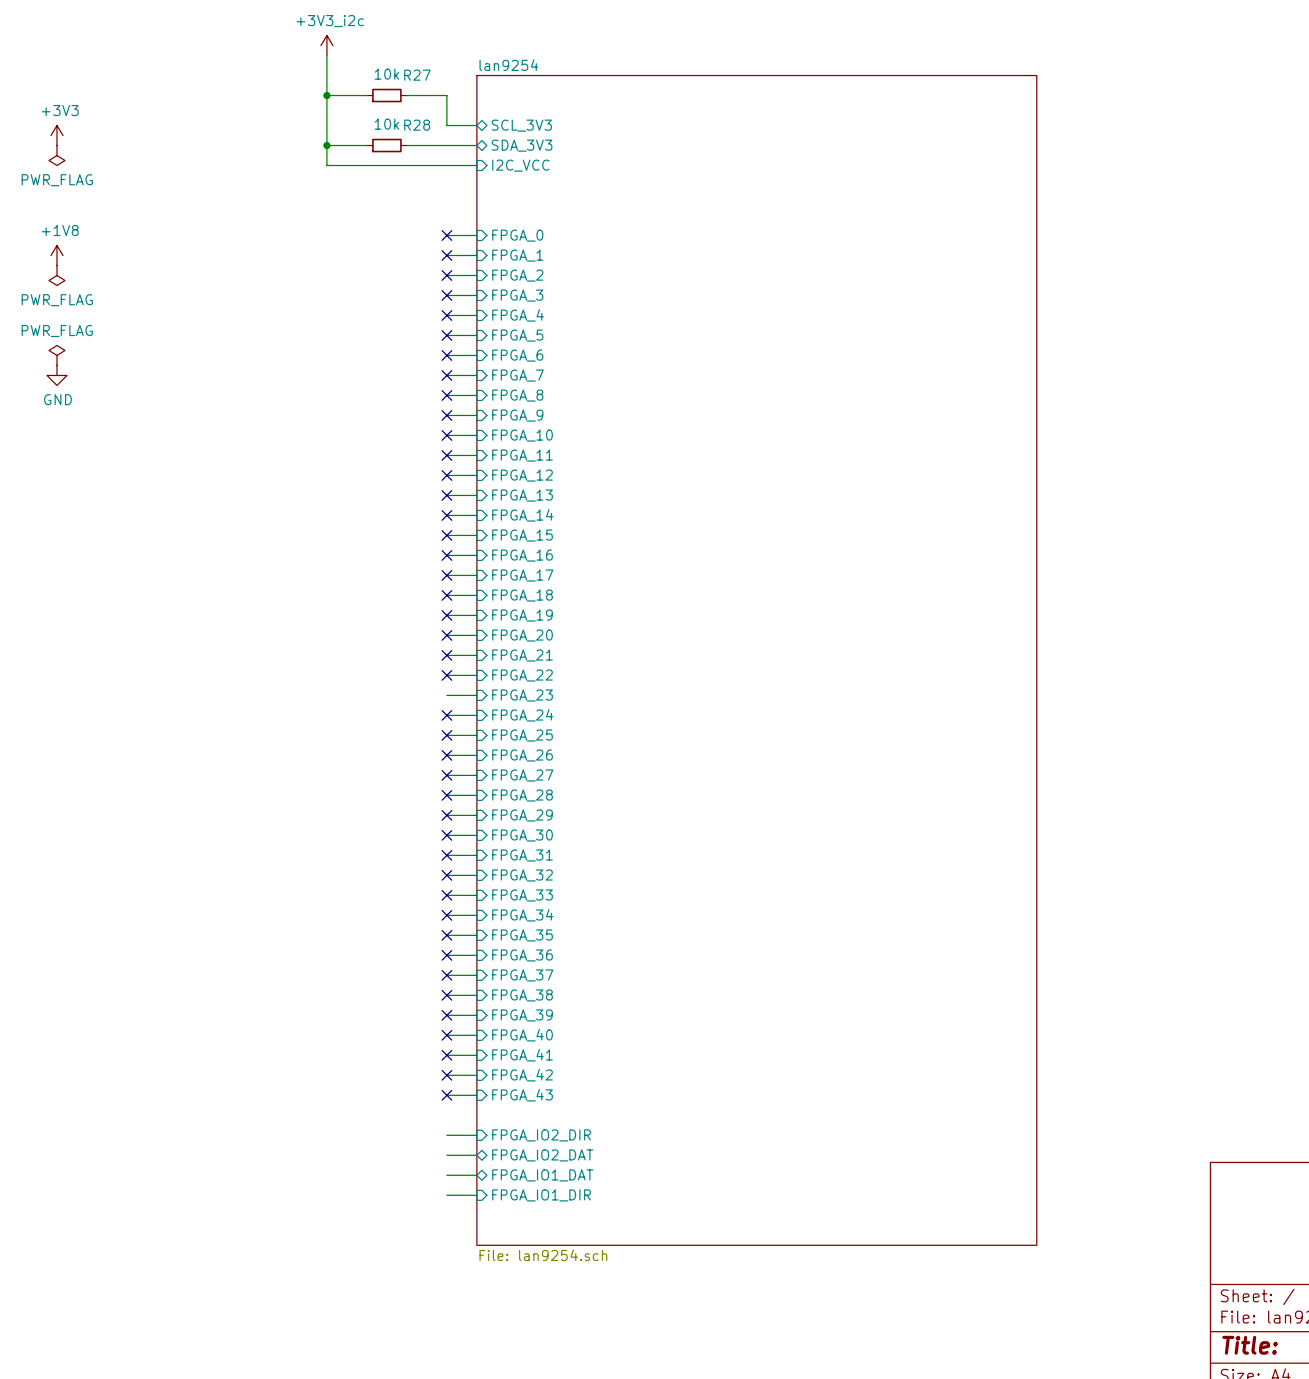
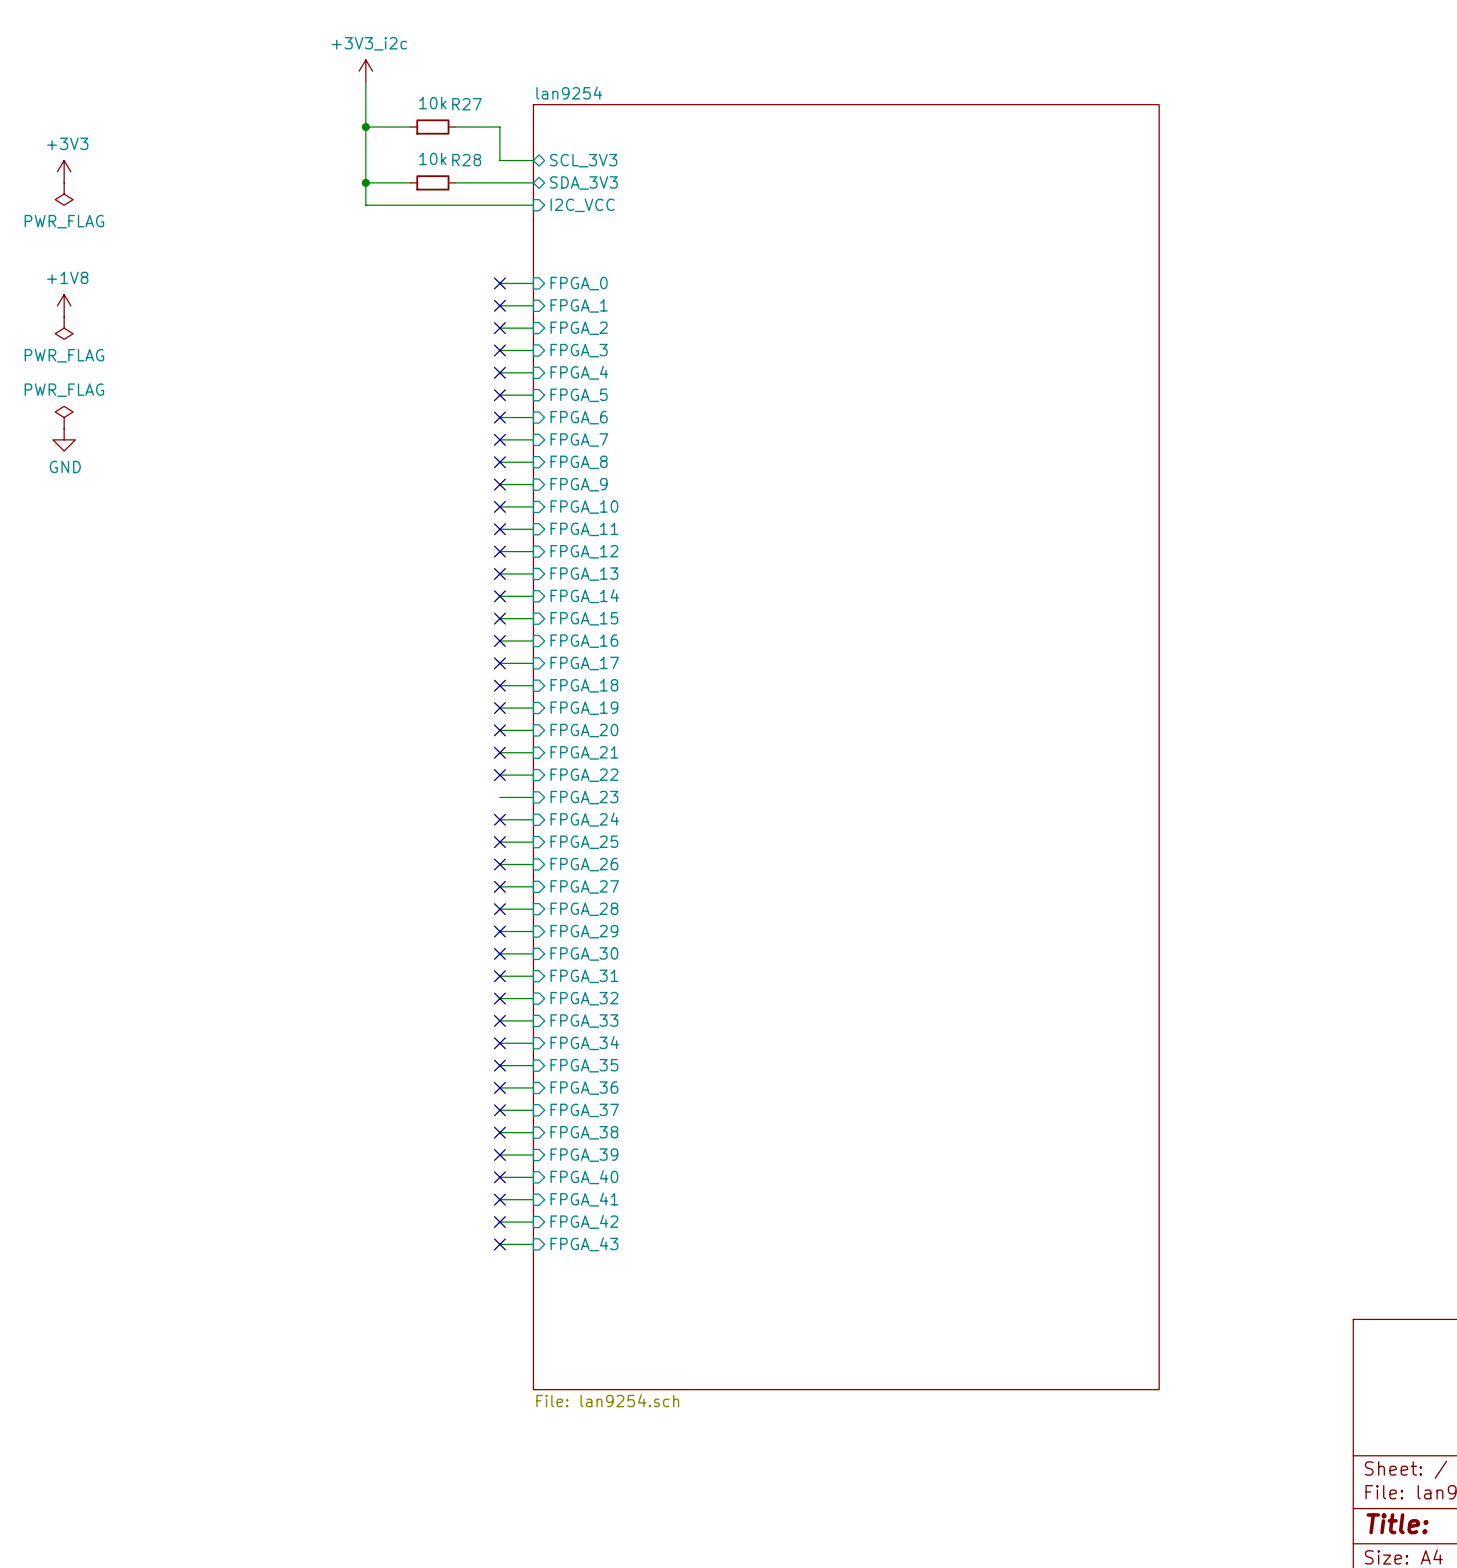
sheet lan9254 shape: [476, 75, 1037, 1246] -> [533, 104, 1160, 1390]
wire: (446, 1135) (476, 1135) -> none
sheet pin: FPGA_IO2_DIR (541, 1135) -> none
wire: (446, 1155) (476, 1155) -> none
sheet pin: FPGA_IO2_DAT (542, 1155) -> none
wire: (446, 1175) (476, 1175) -> none
sheet pin: FPGA_IO1_DAT (542, 1175) -> none
wire: (446, 1195) (476, 1195) -> none
sheet pin: FPGA_IO1_DIR (541, 1195) -> none

